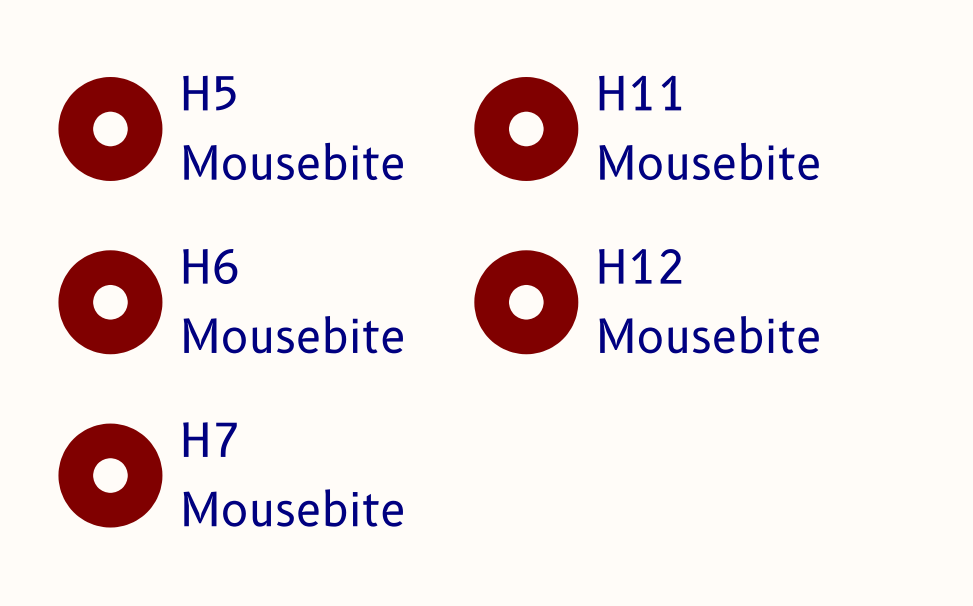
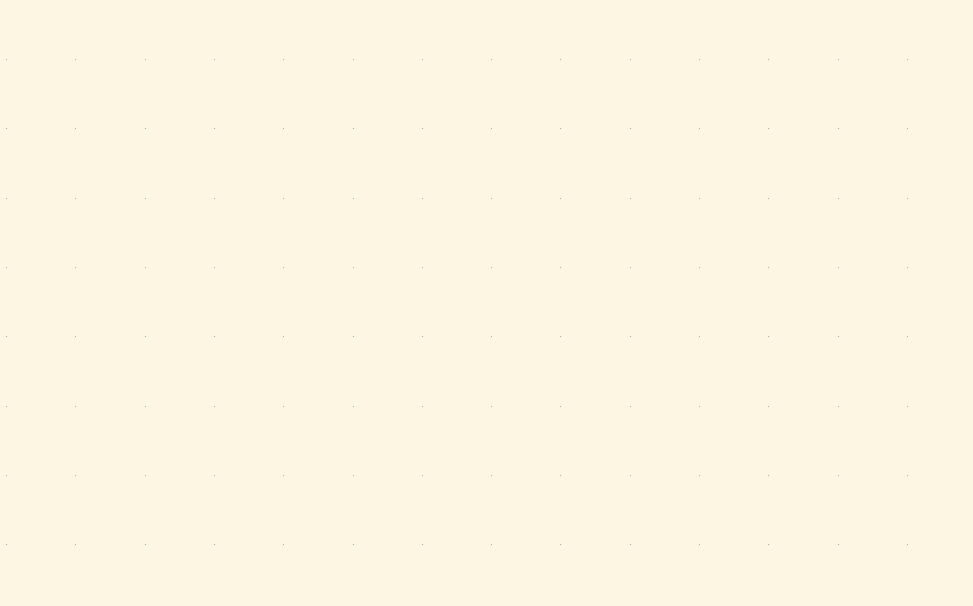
H5: Mousebite (110, 128) -> none
H11: Mousebite (526, 128) -> none
H6: Mousebite (110, 302) -> none
H12: Mousebite (526, 302) -> none
H7: Mousebite (110, 475) -> none

